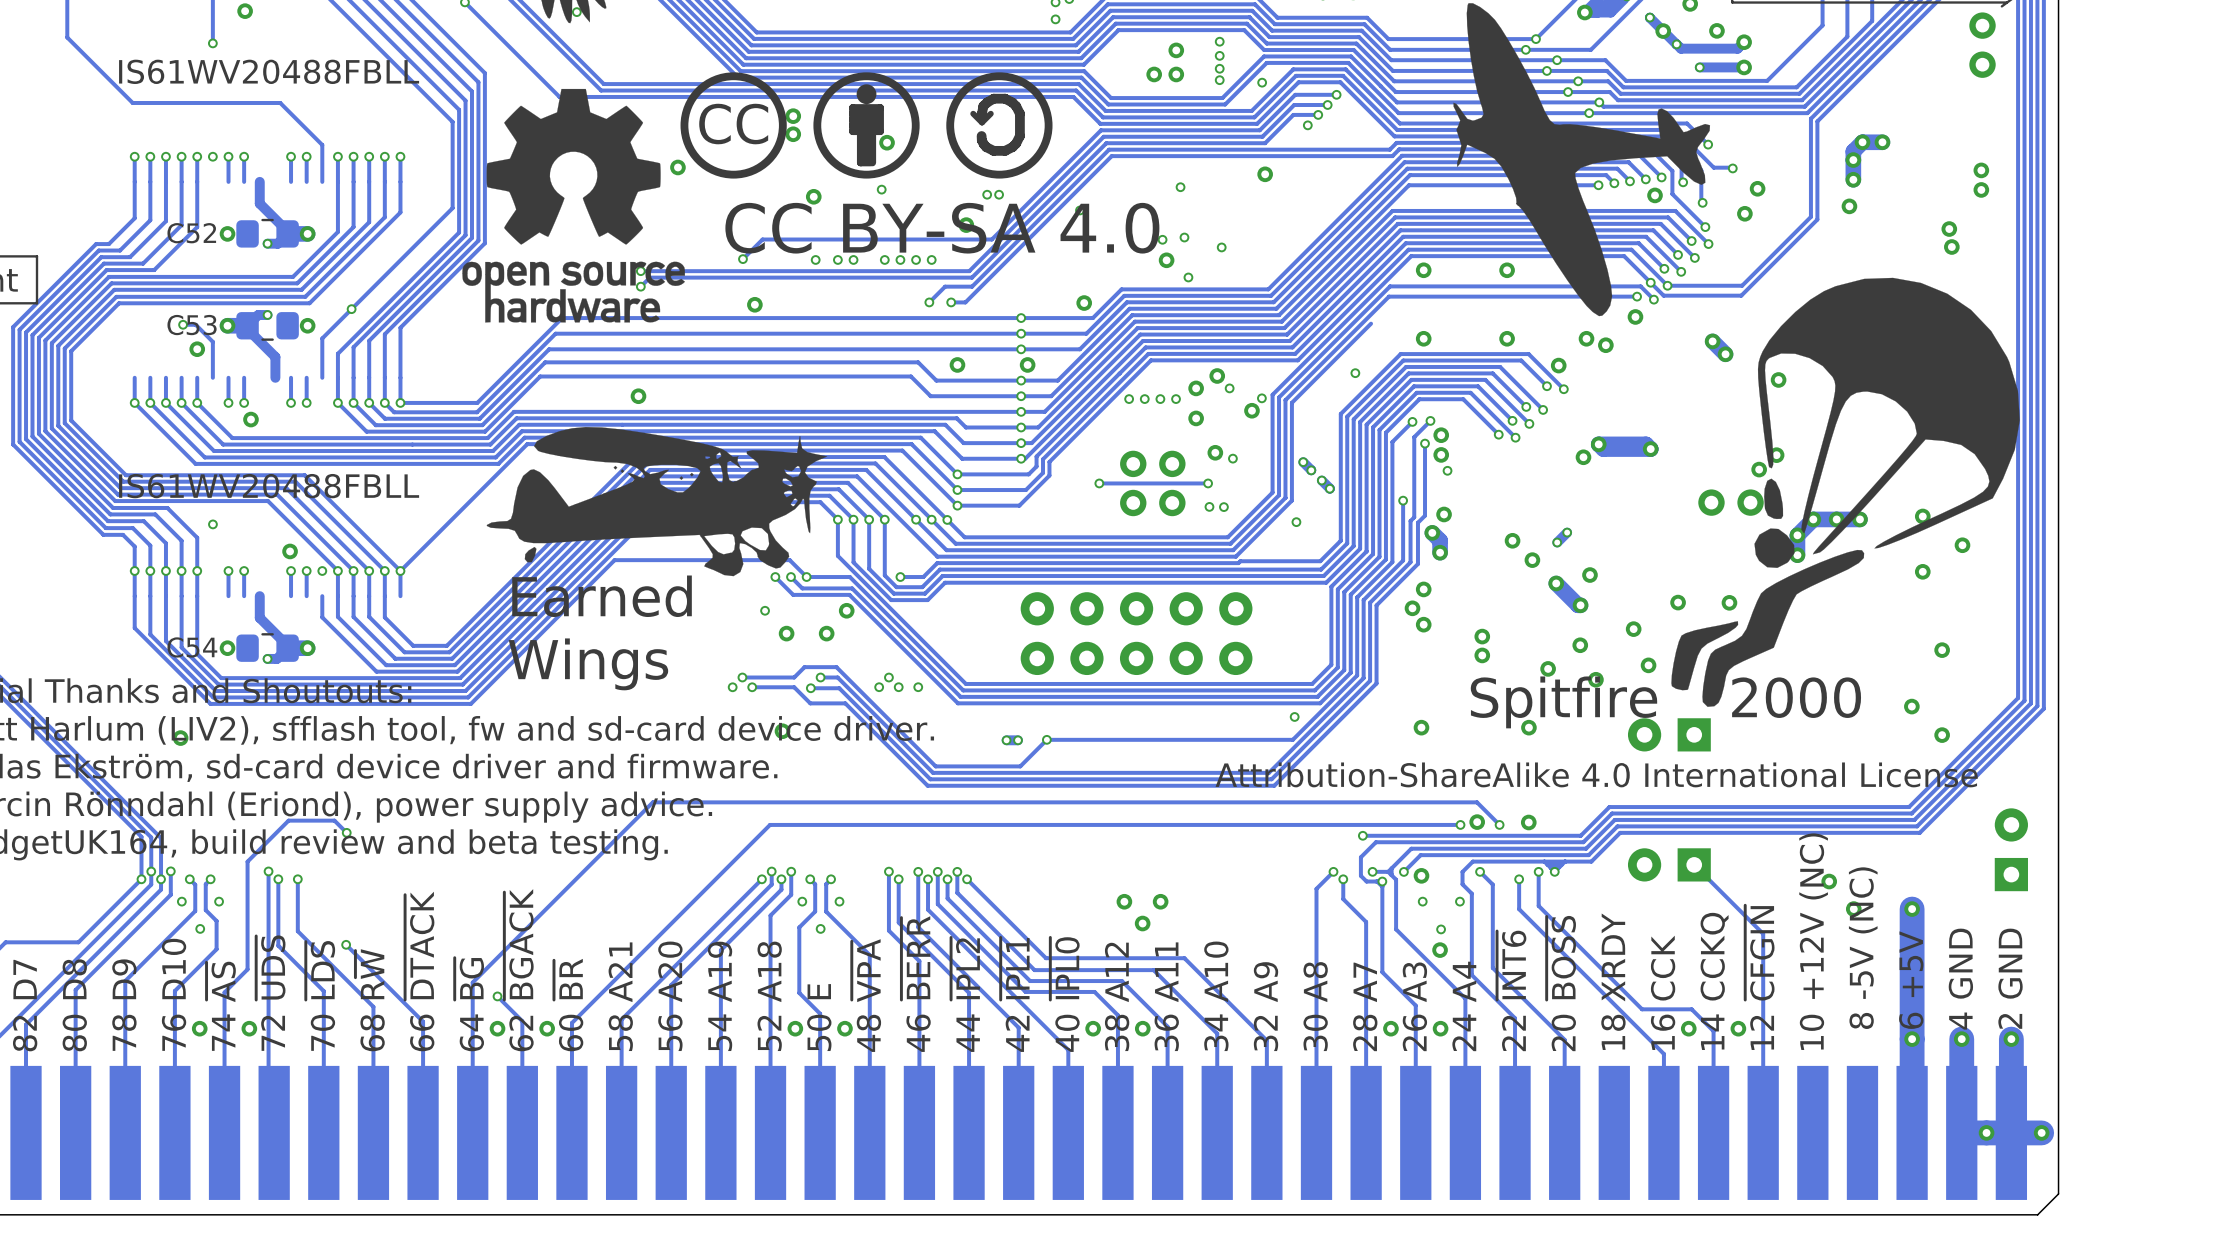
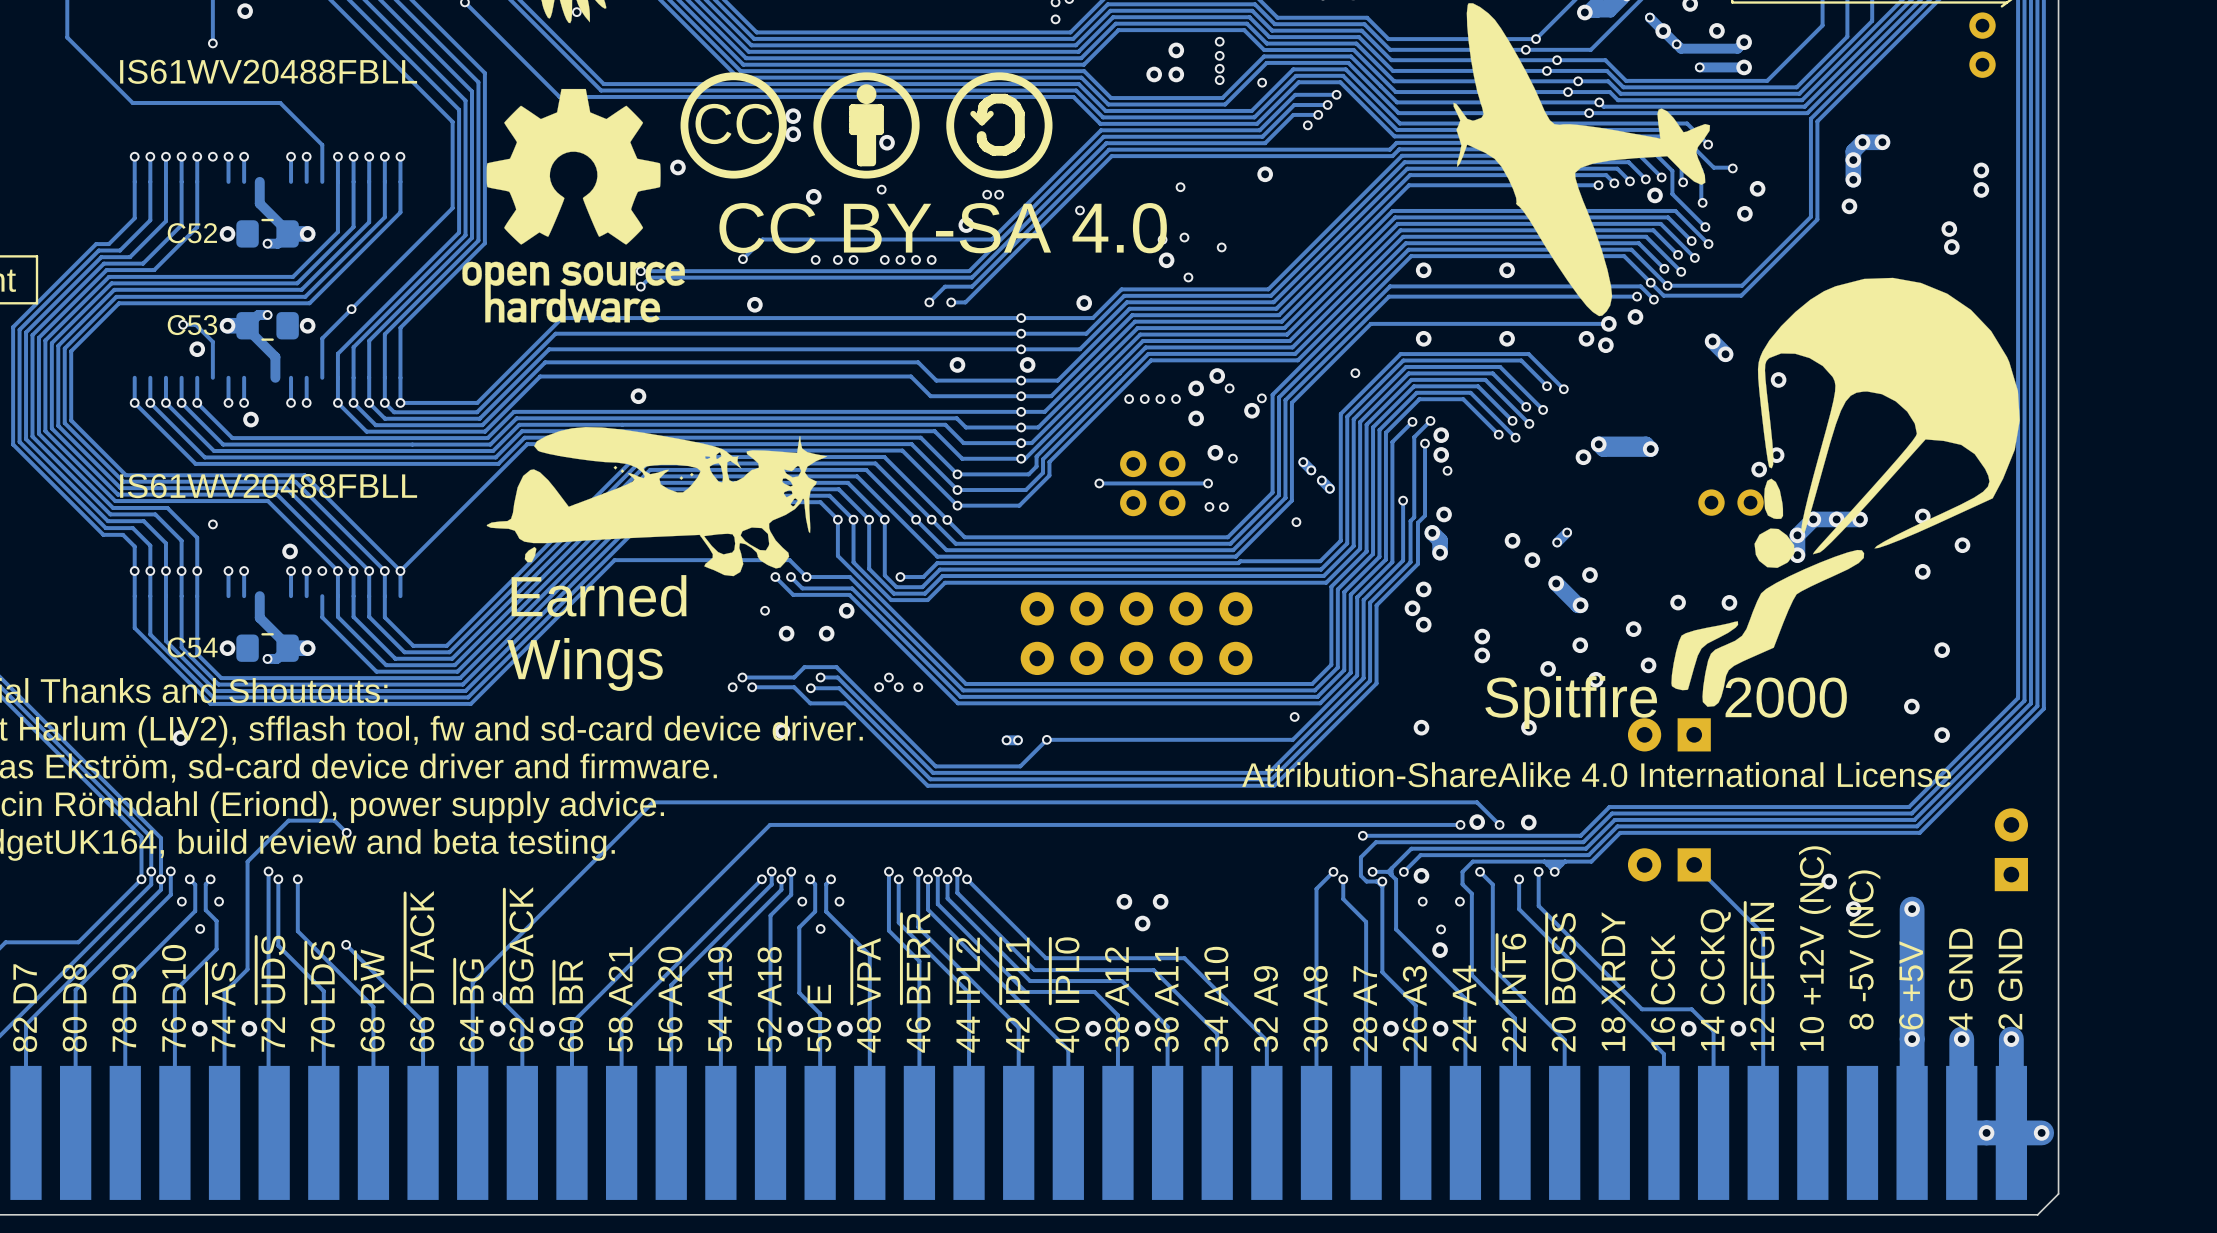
track: none -> (1608, 323) (1370, 323)
via position: (1558, 365) -> (1608, 323)

